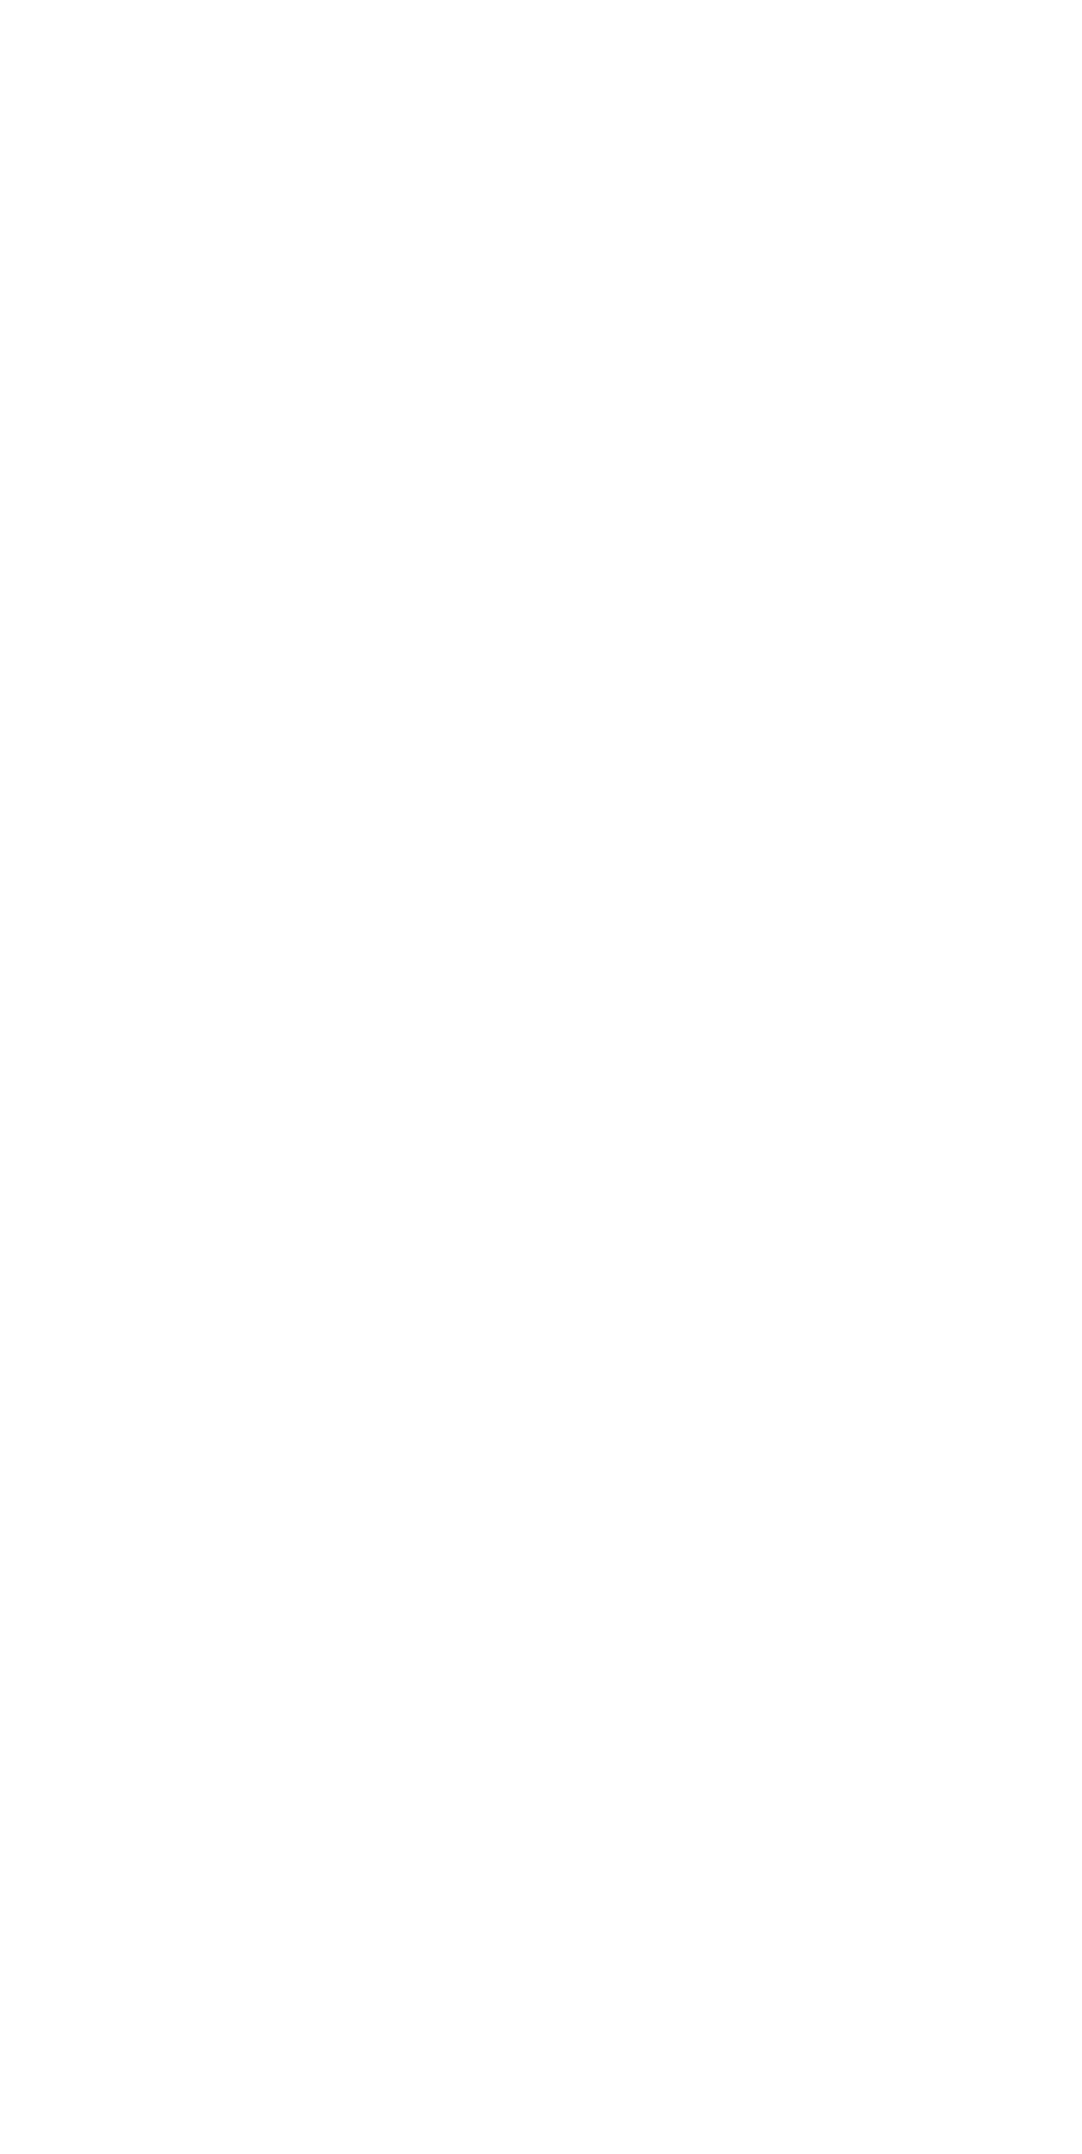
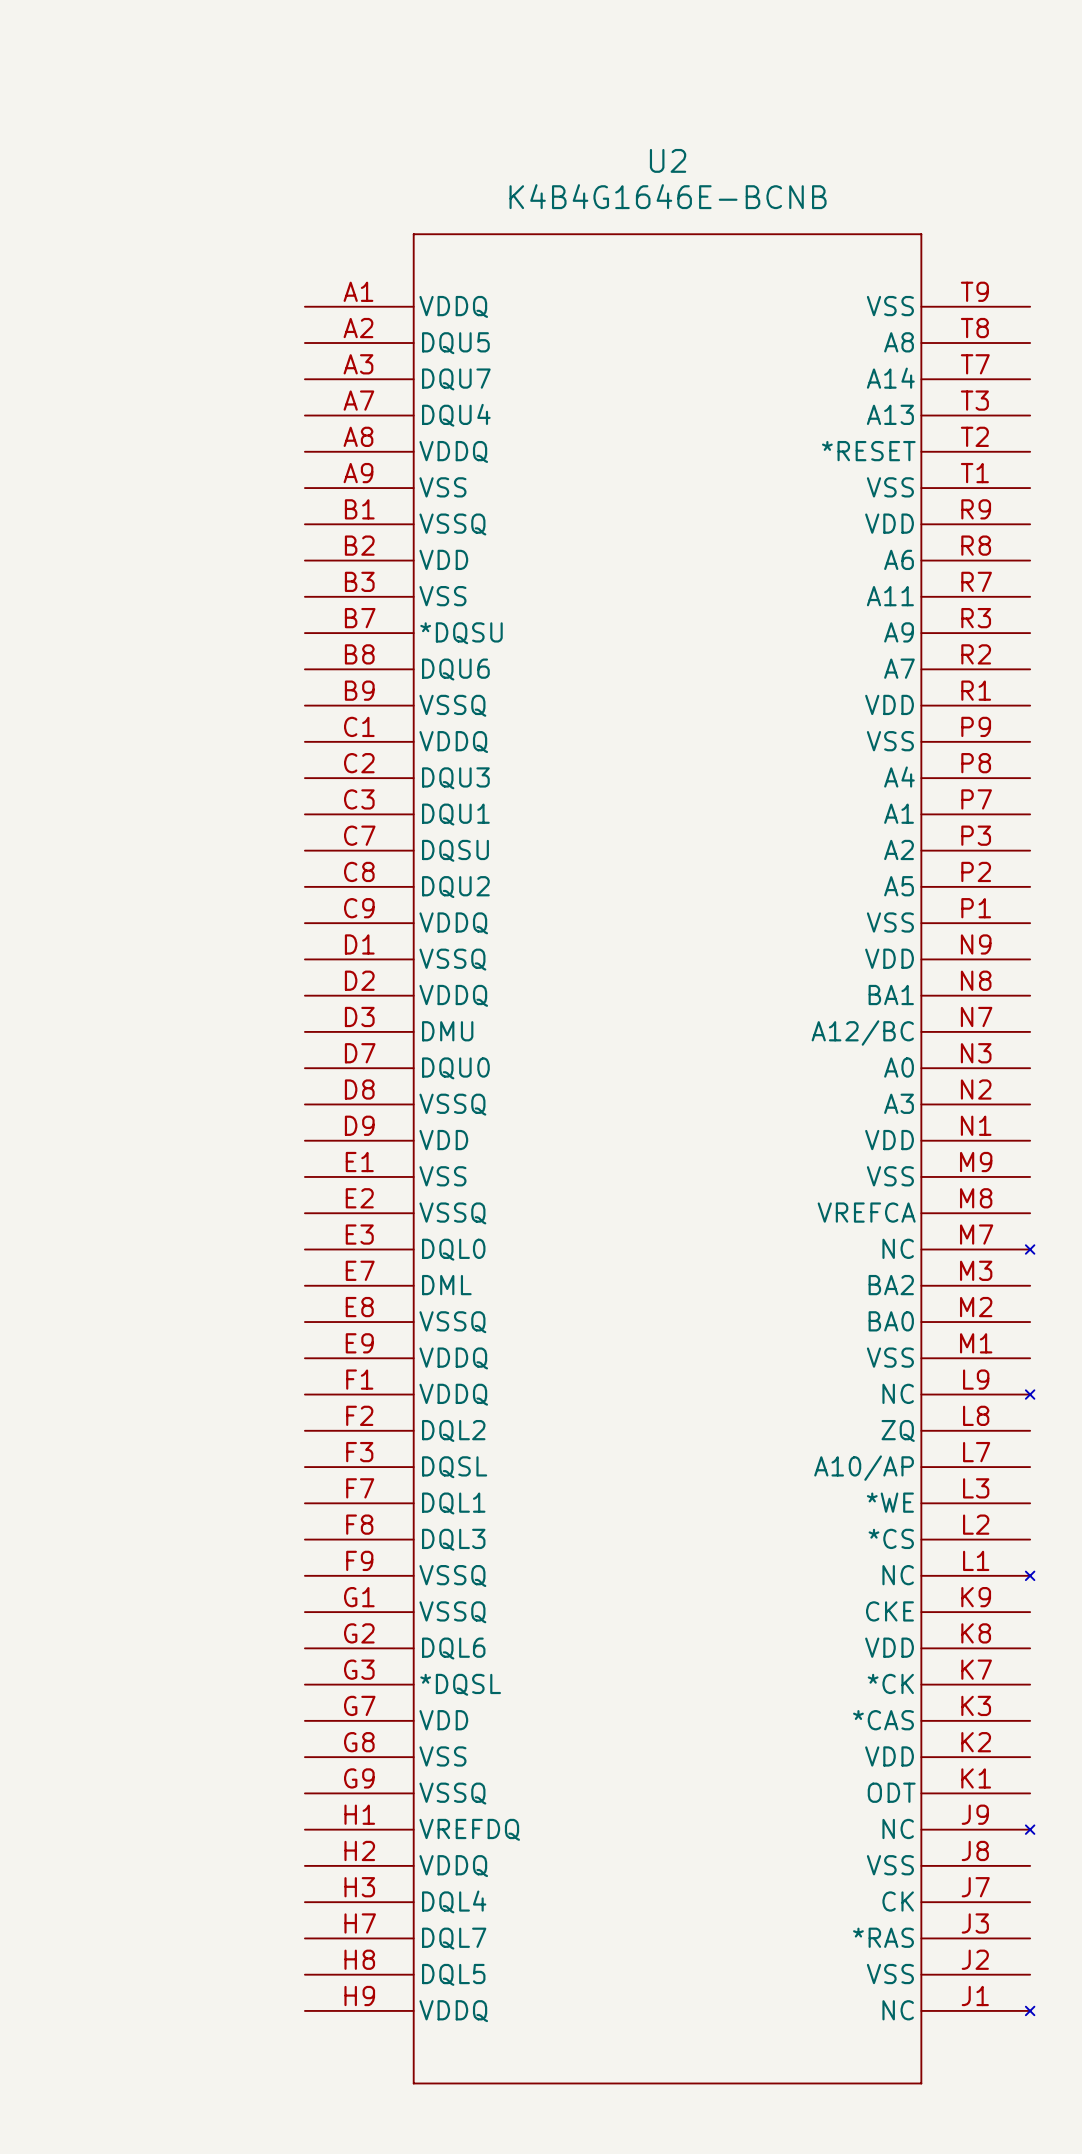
U2: none -> K4B4G1646E-BCNB (669, 1158)

